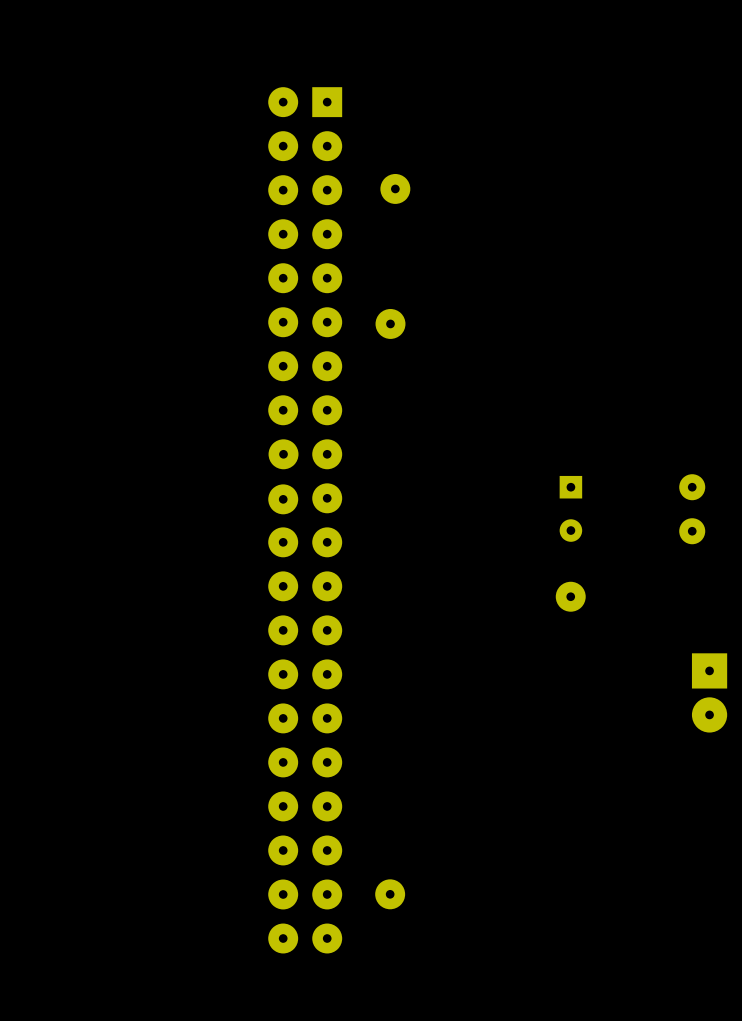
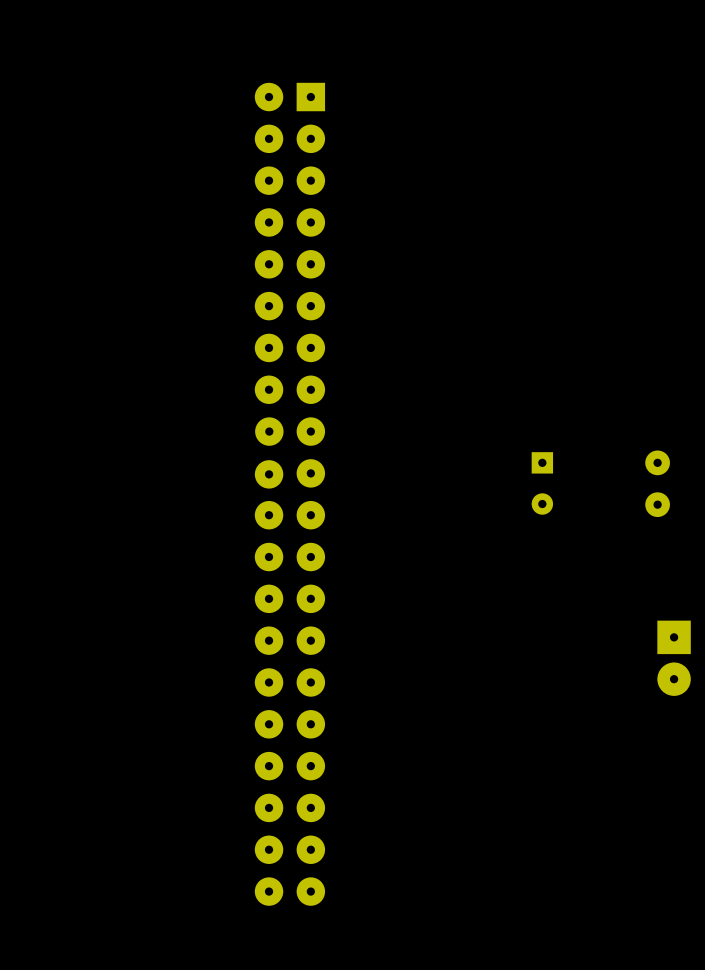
part: (395, 188) -> none
part: (390, 323) -> none
part: (570, 596) -> none
part: (390, 894) -> none

